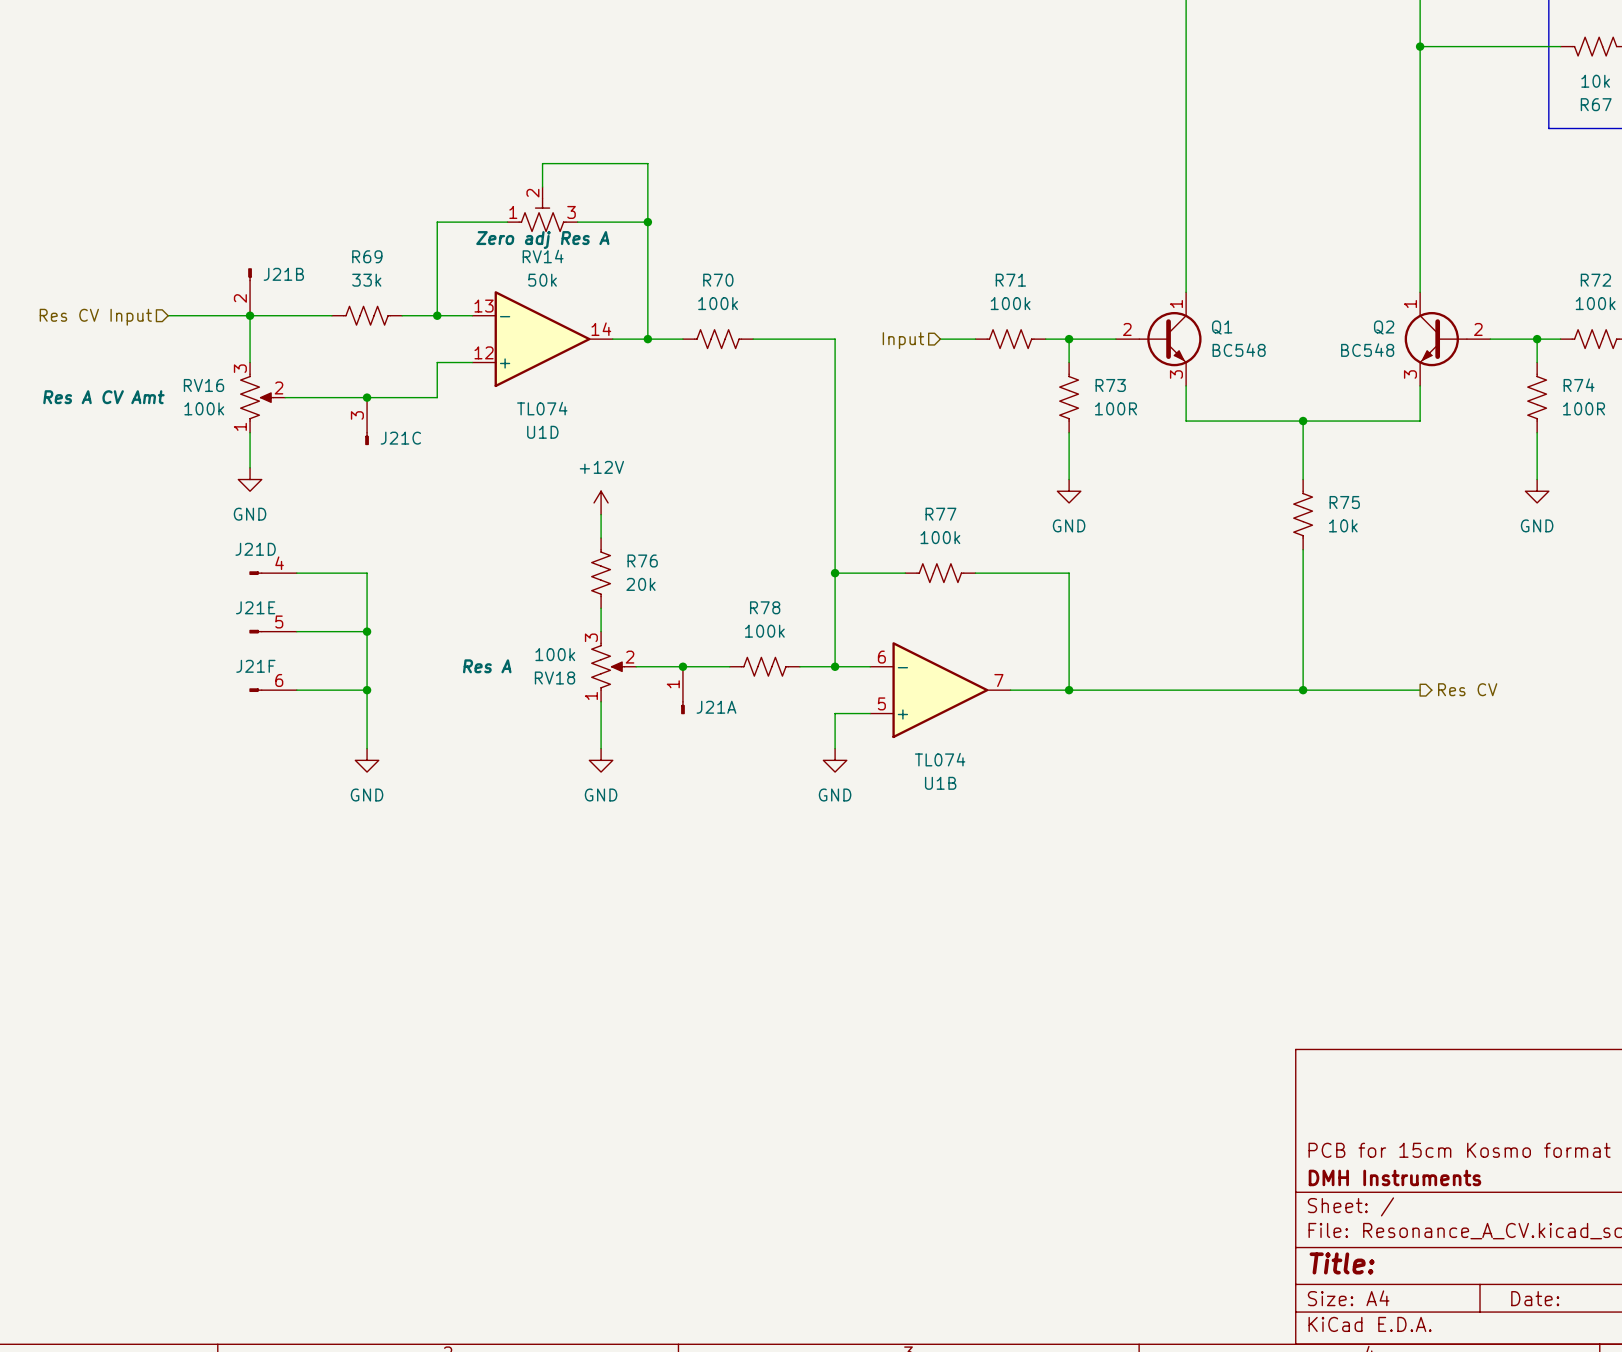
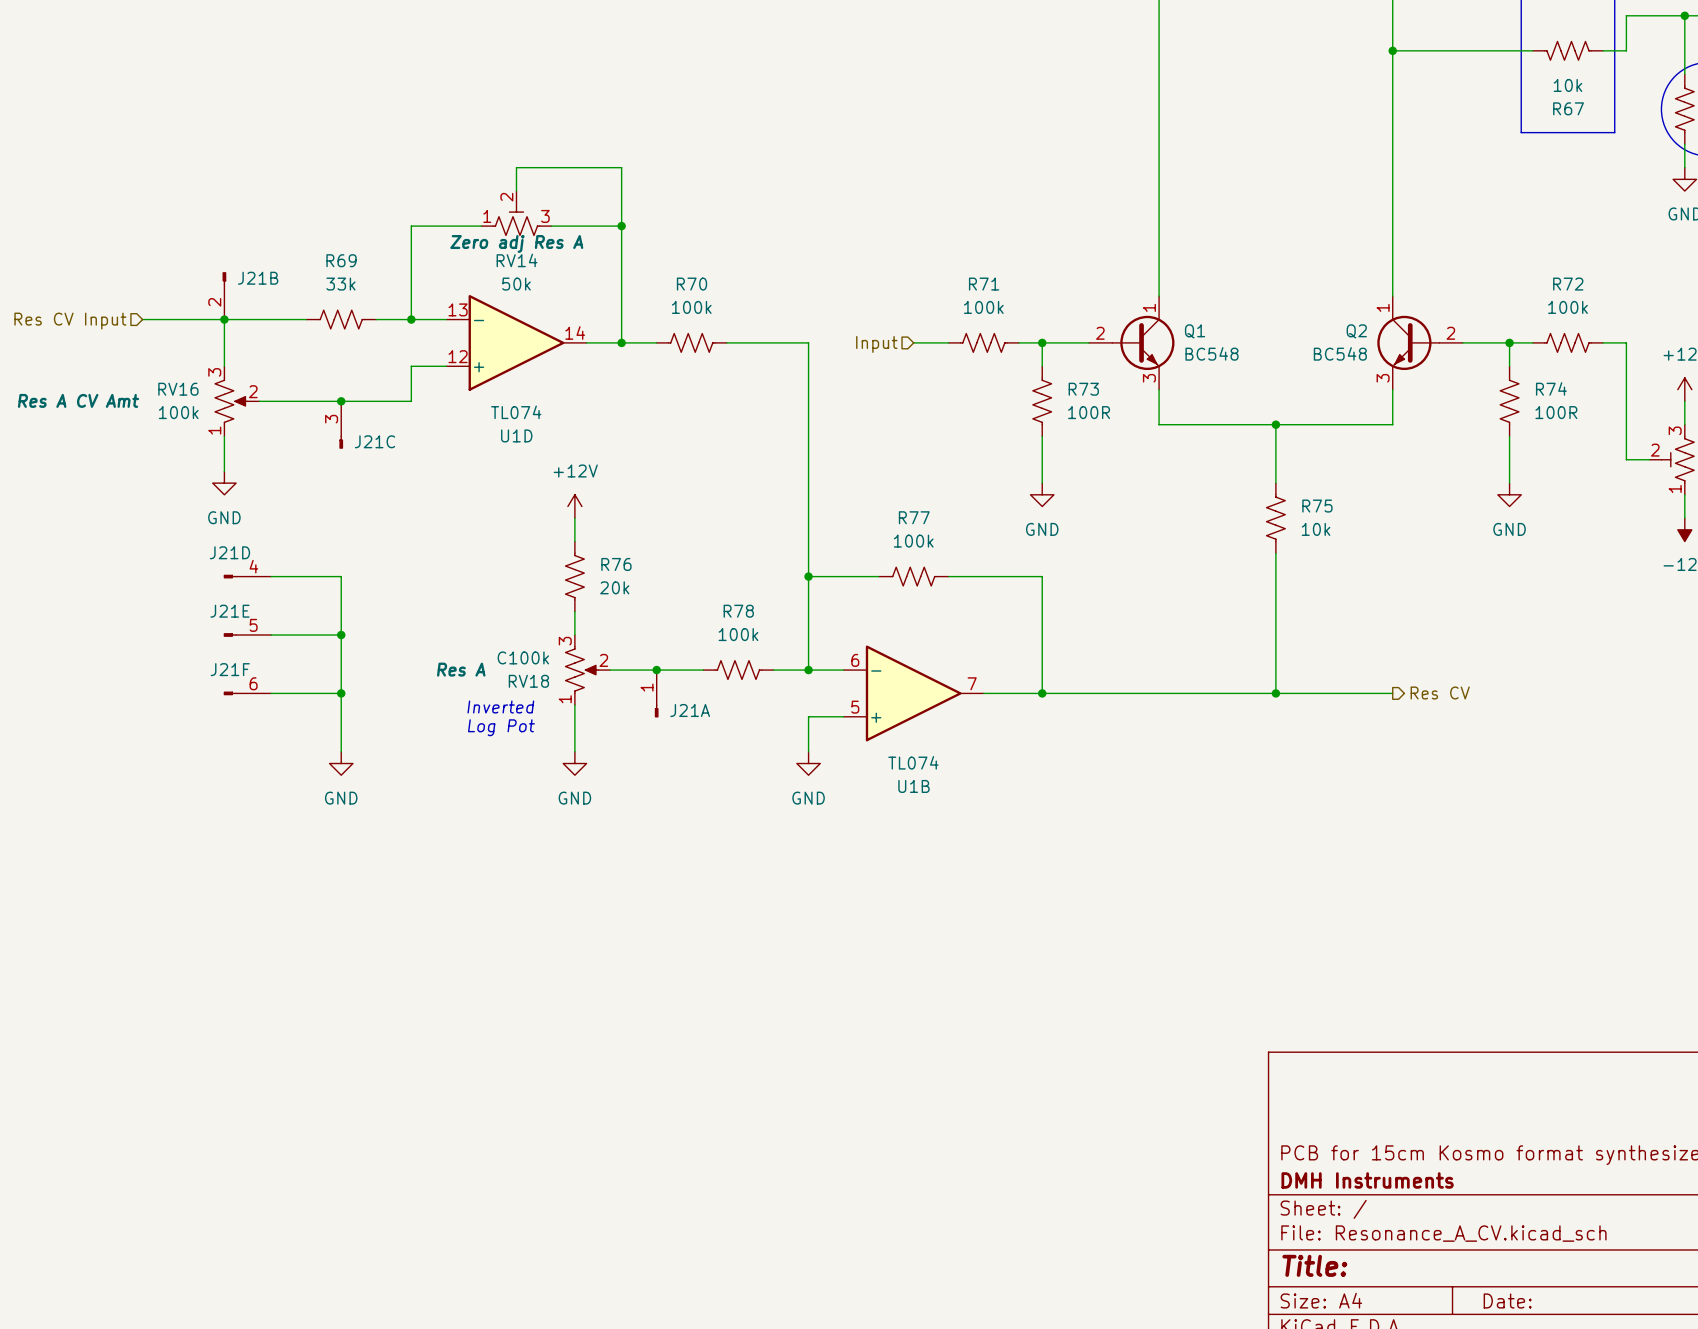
RV18 value: 100k (555, 654) -> C100k (523, 657)
text: none -> Inverted (500, 706)
text: none -> Log Pot (501, 727)

